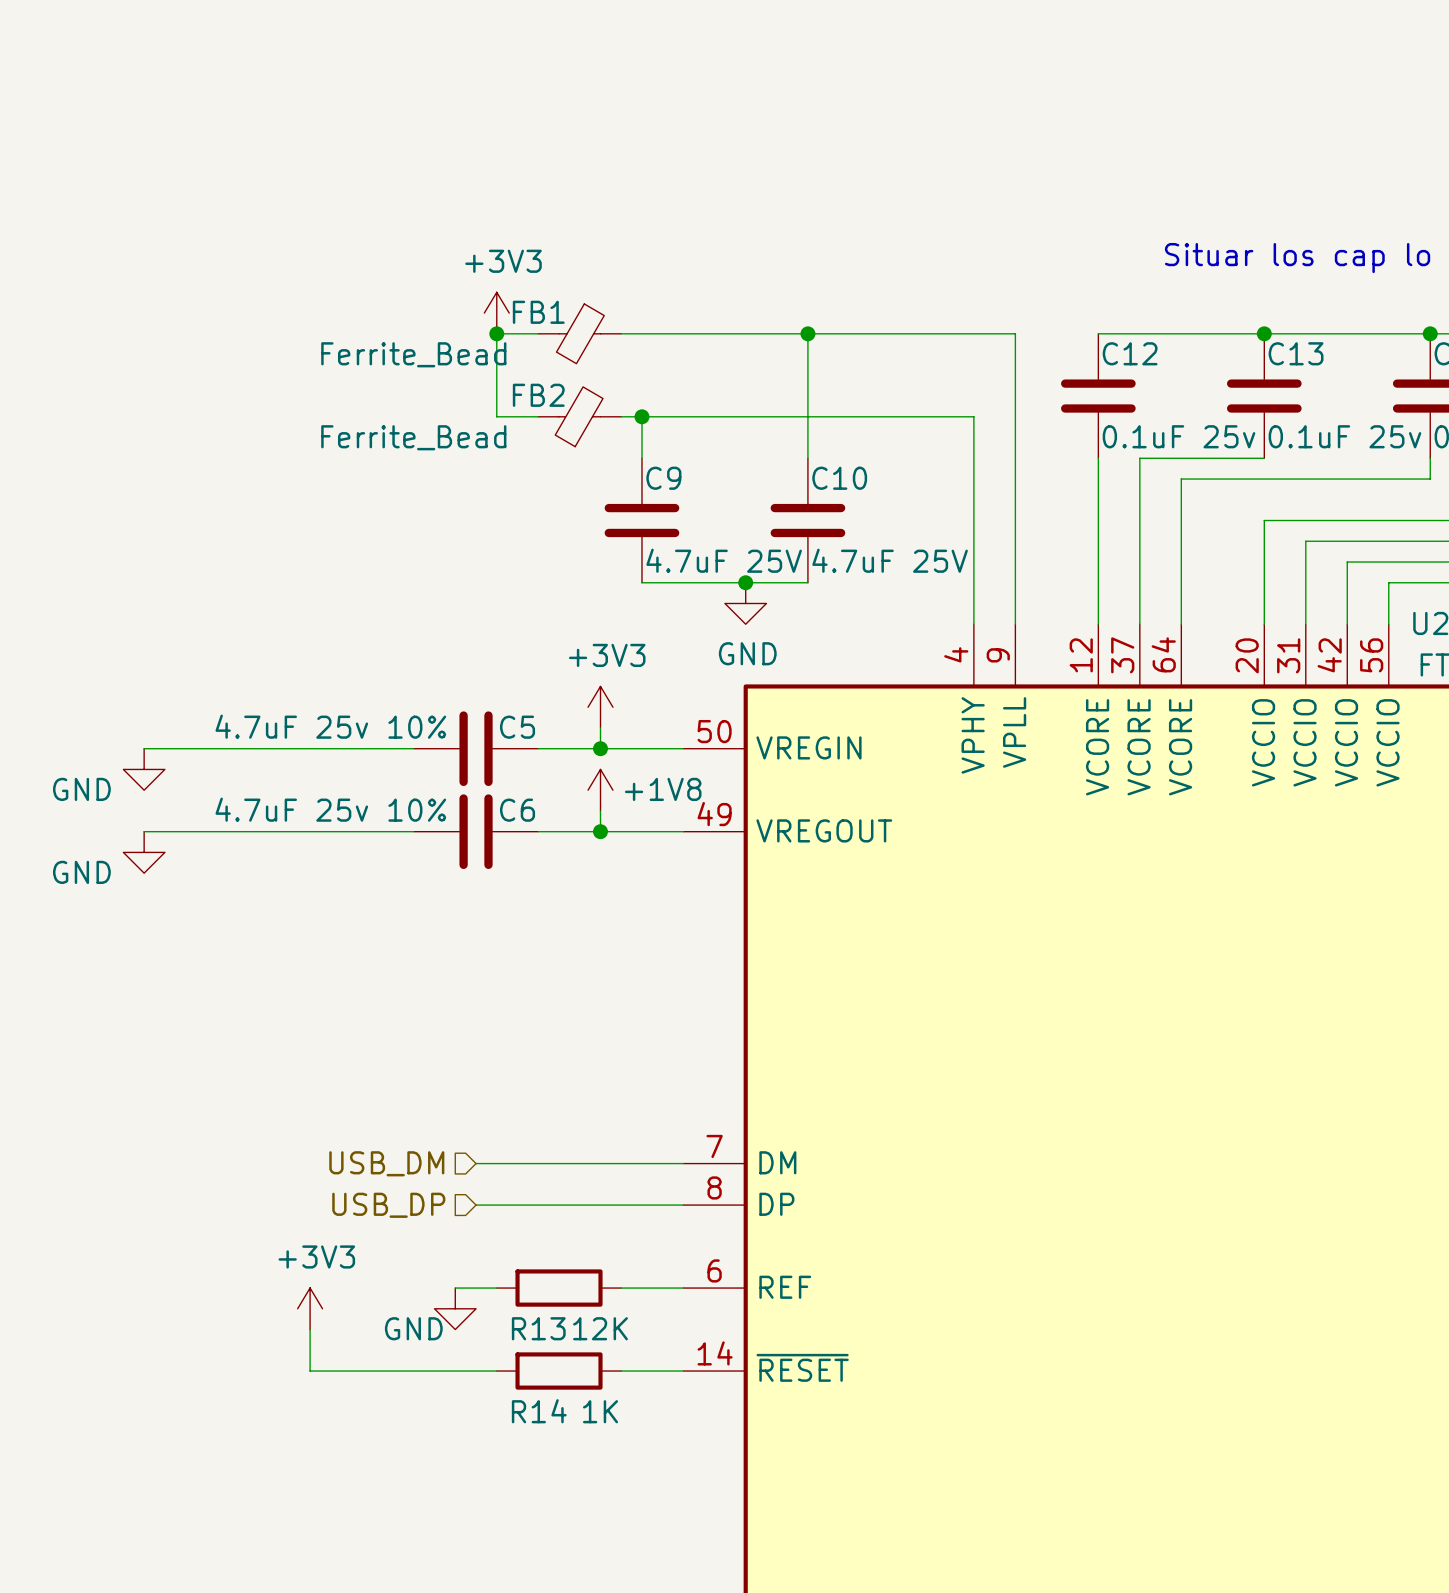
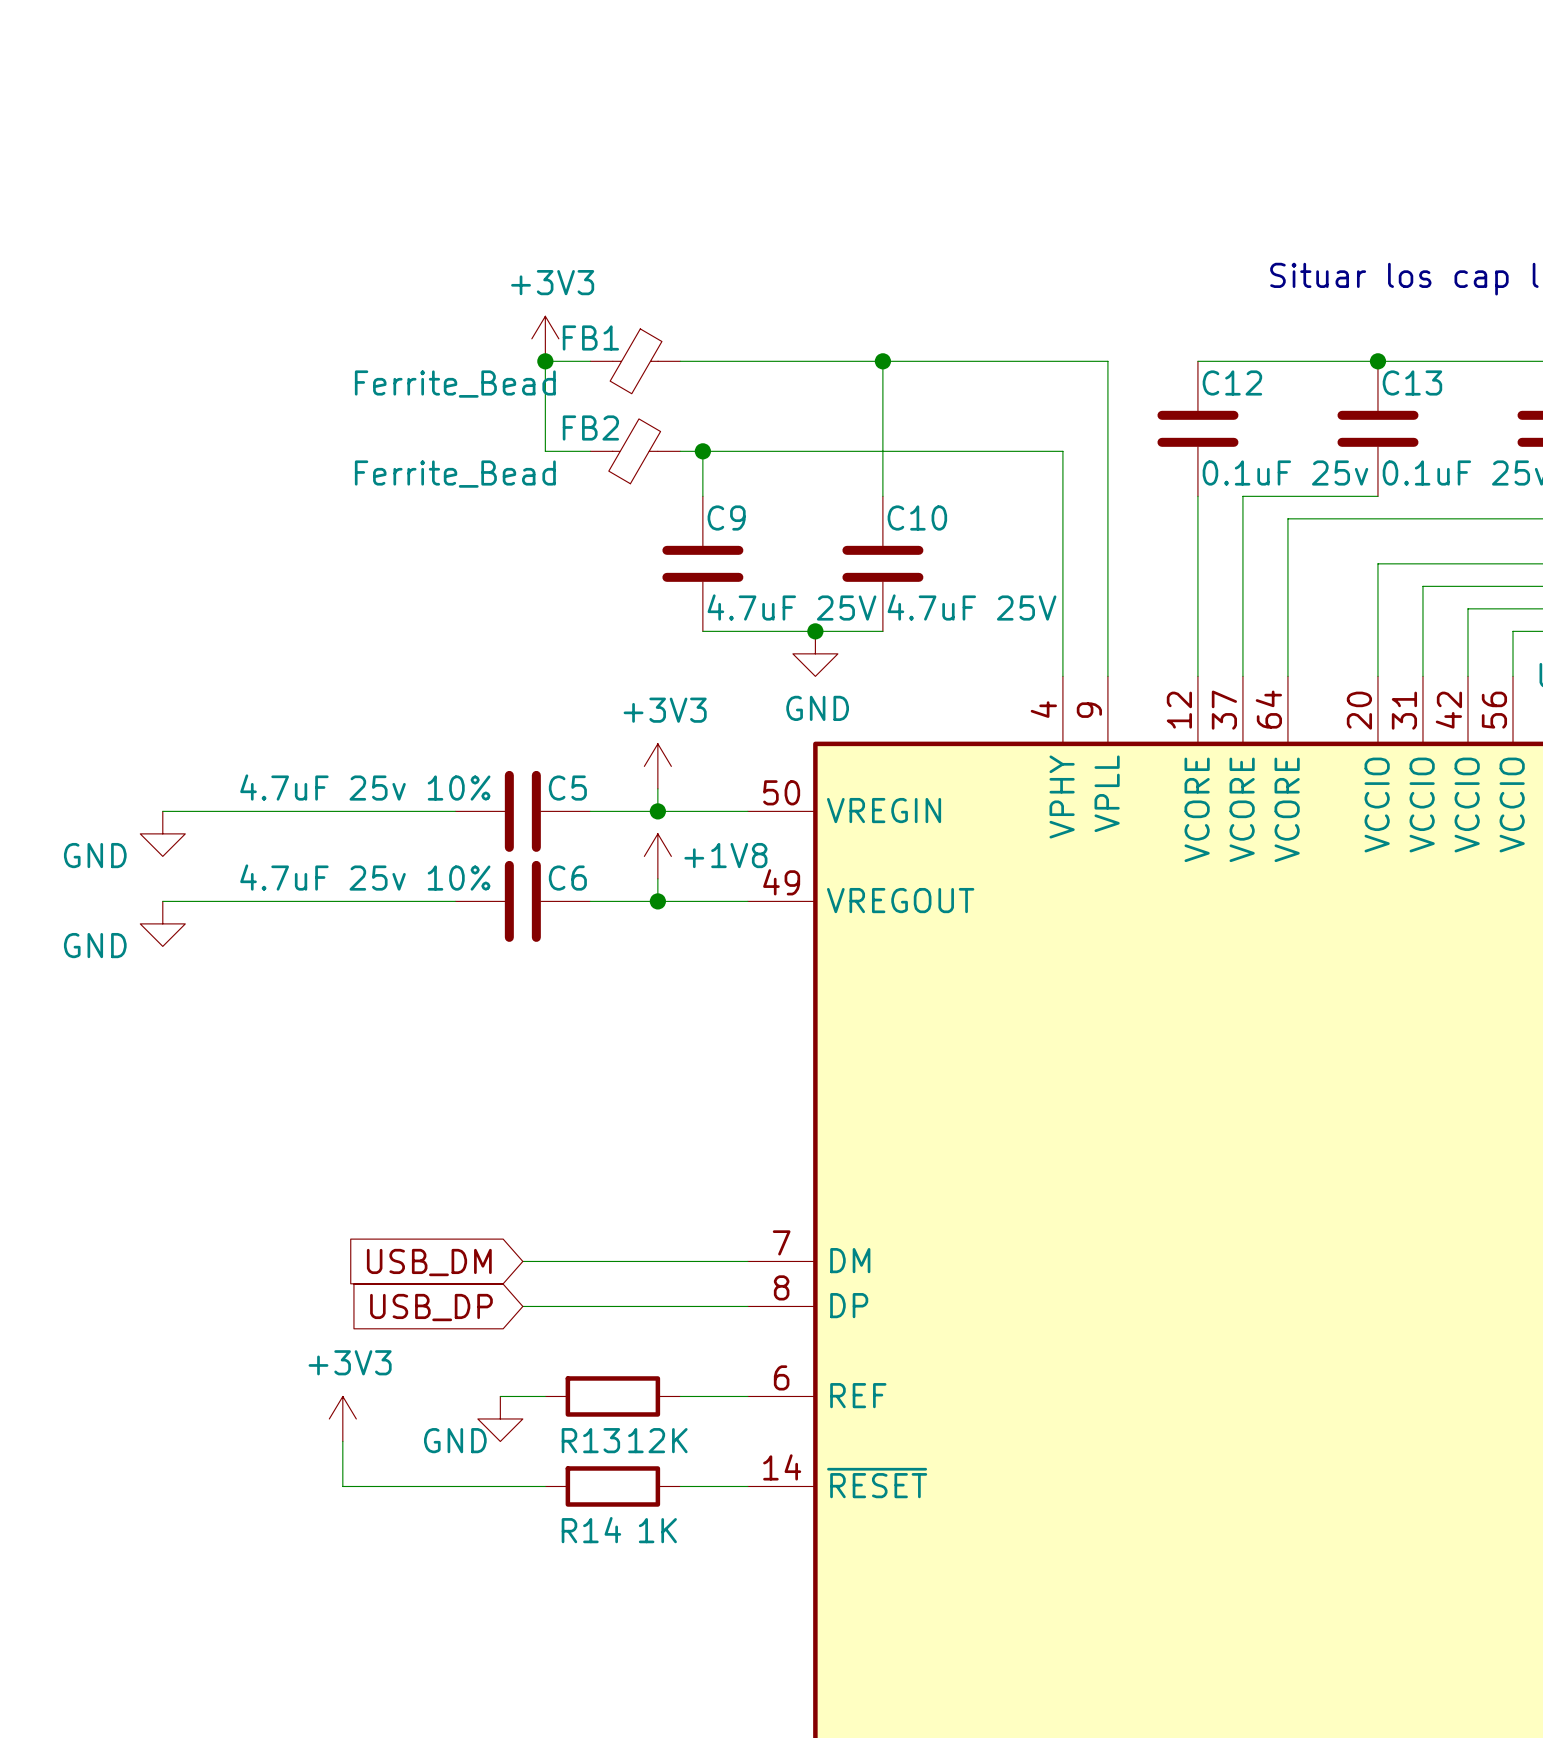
hierarchical label: USB_DM (386, 1163) -> none
global label: none -> USB_DM (429, 1262)
hierarchical label: USB_DP (388, 1205) -> none
global label: none -> USB_DP (431, 1307)

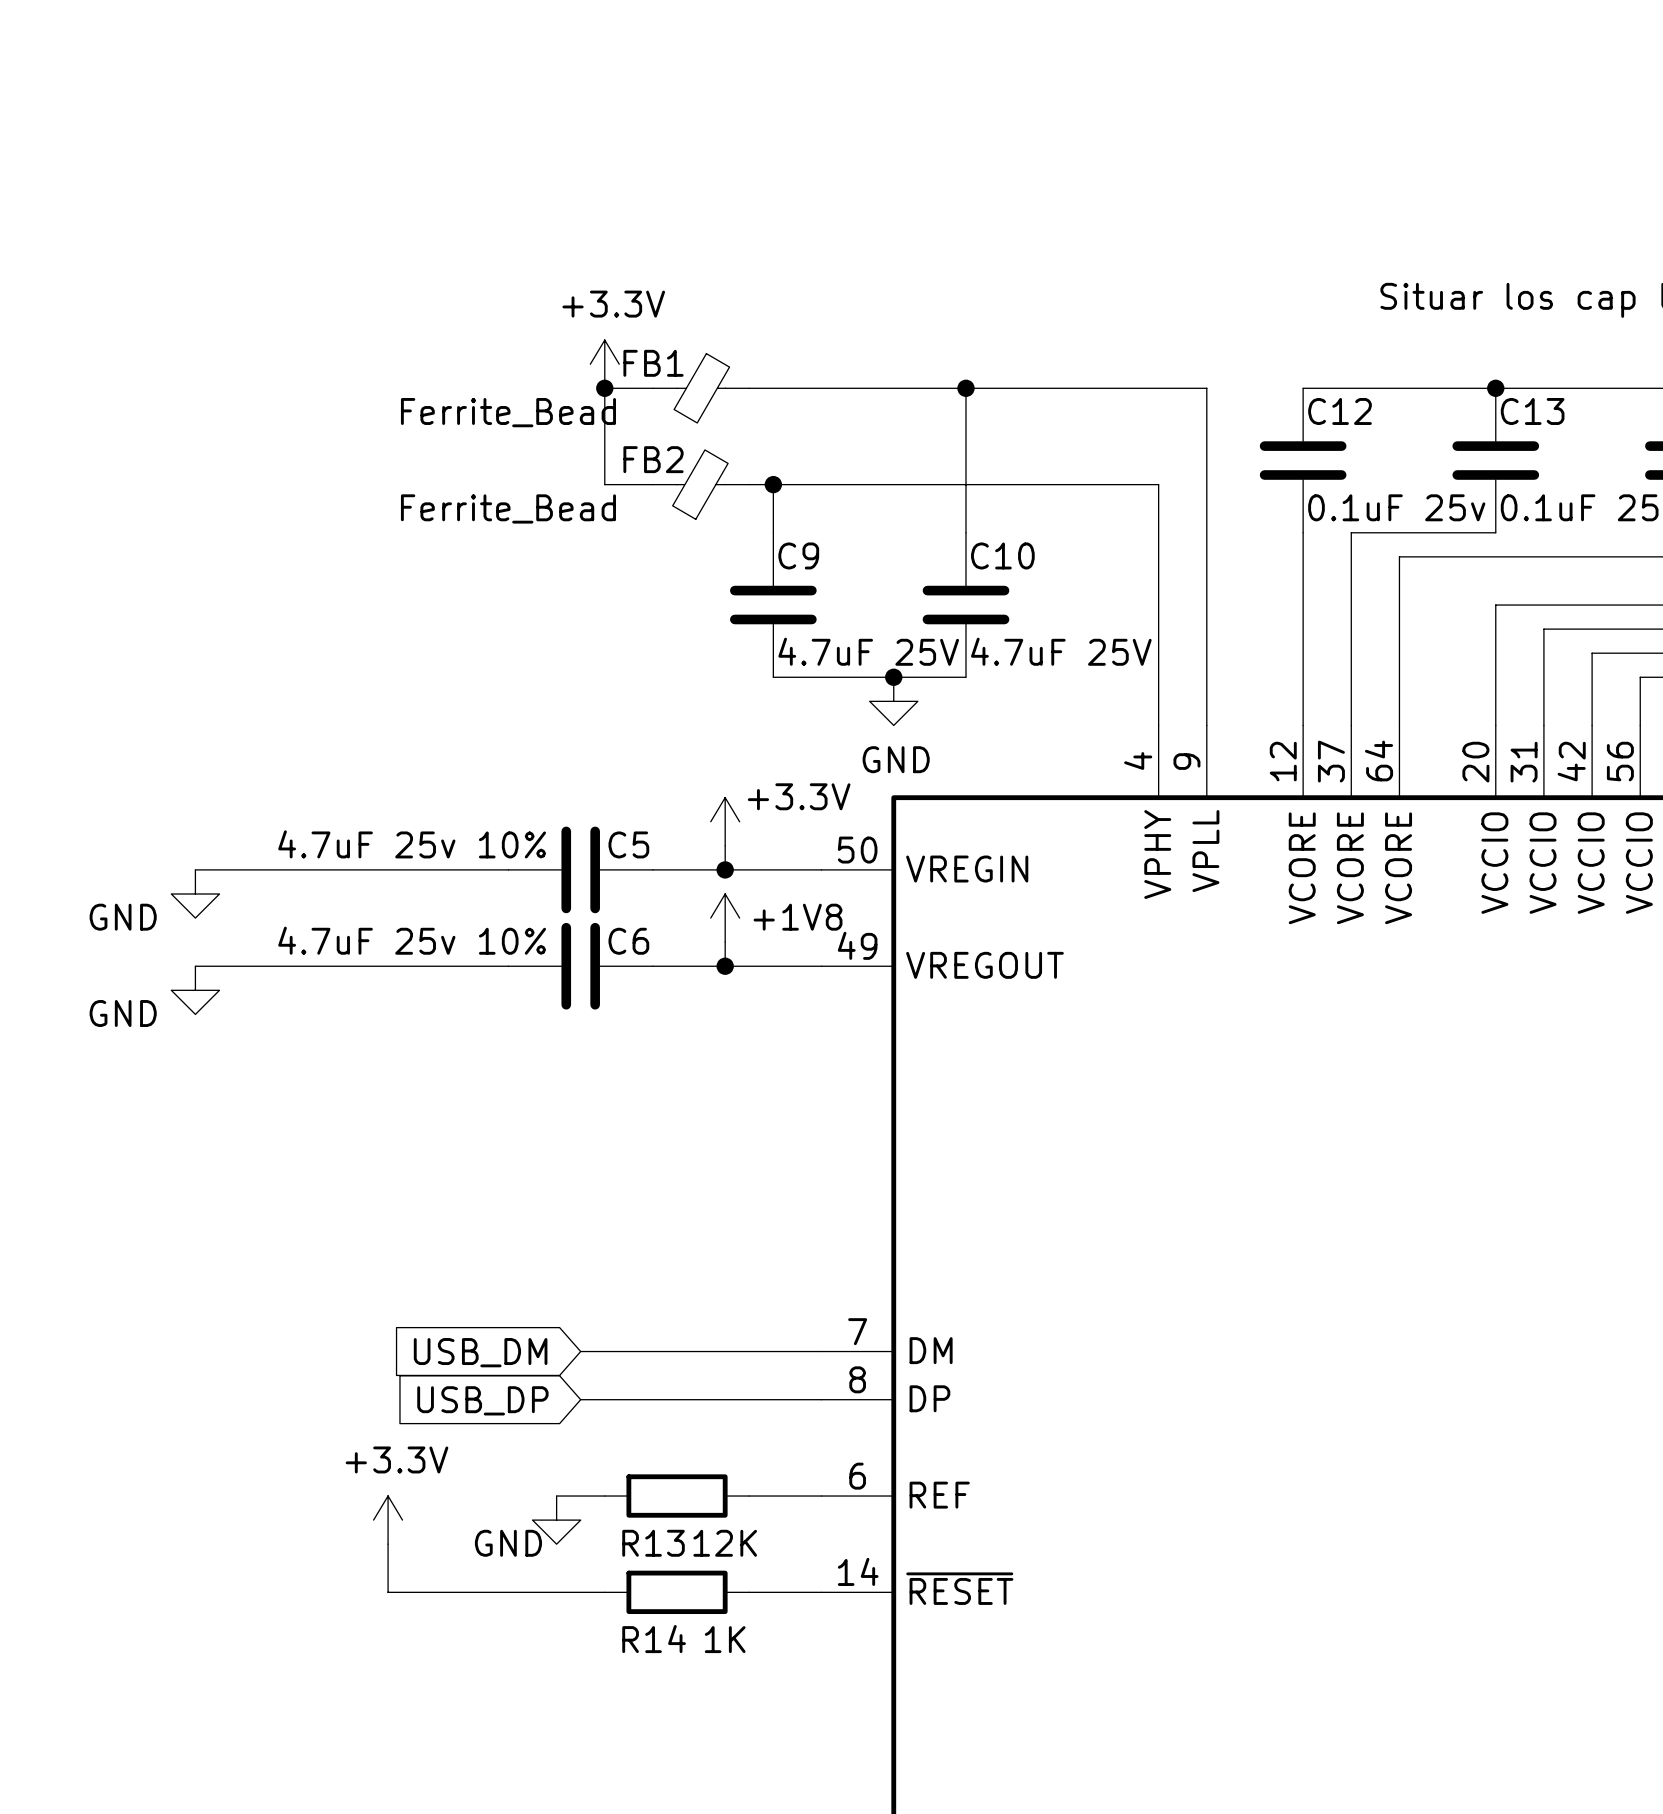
power symbol: +3V3 (545, 338) -> +3.3V (604, 364)
power symbol: +3V3 (657, 766) -> +3.3V (725, 821)
power symbol: +3V3 (342, 1418) -> +3.3V (388, 1520)

